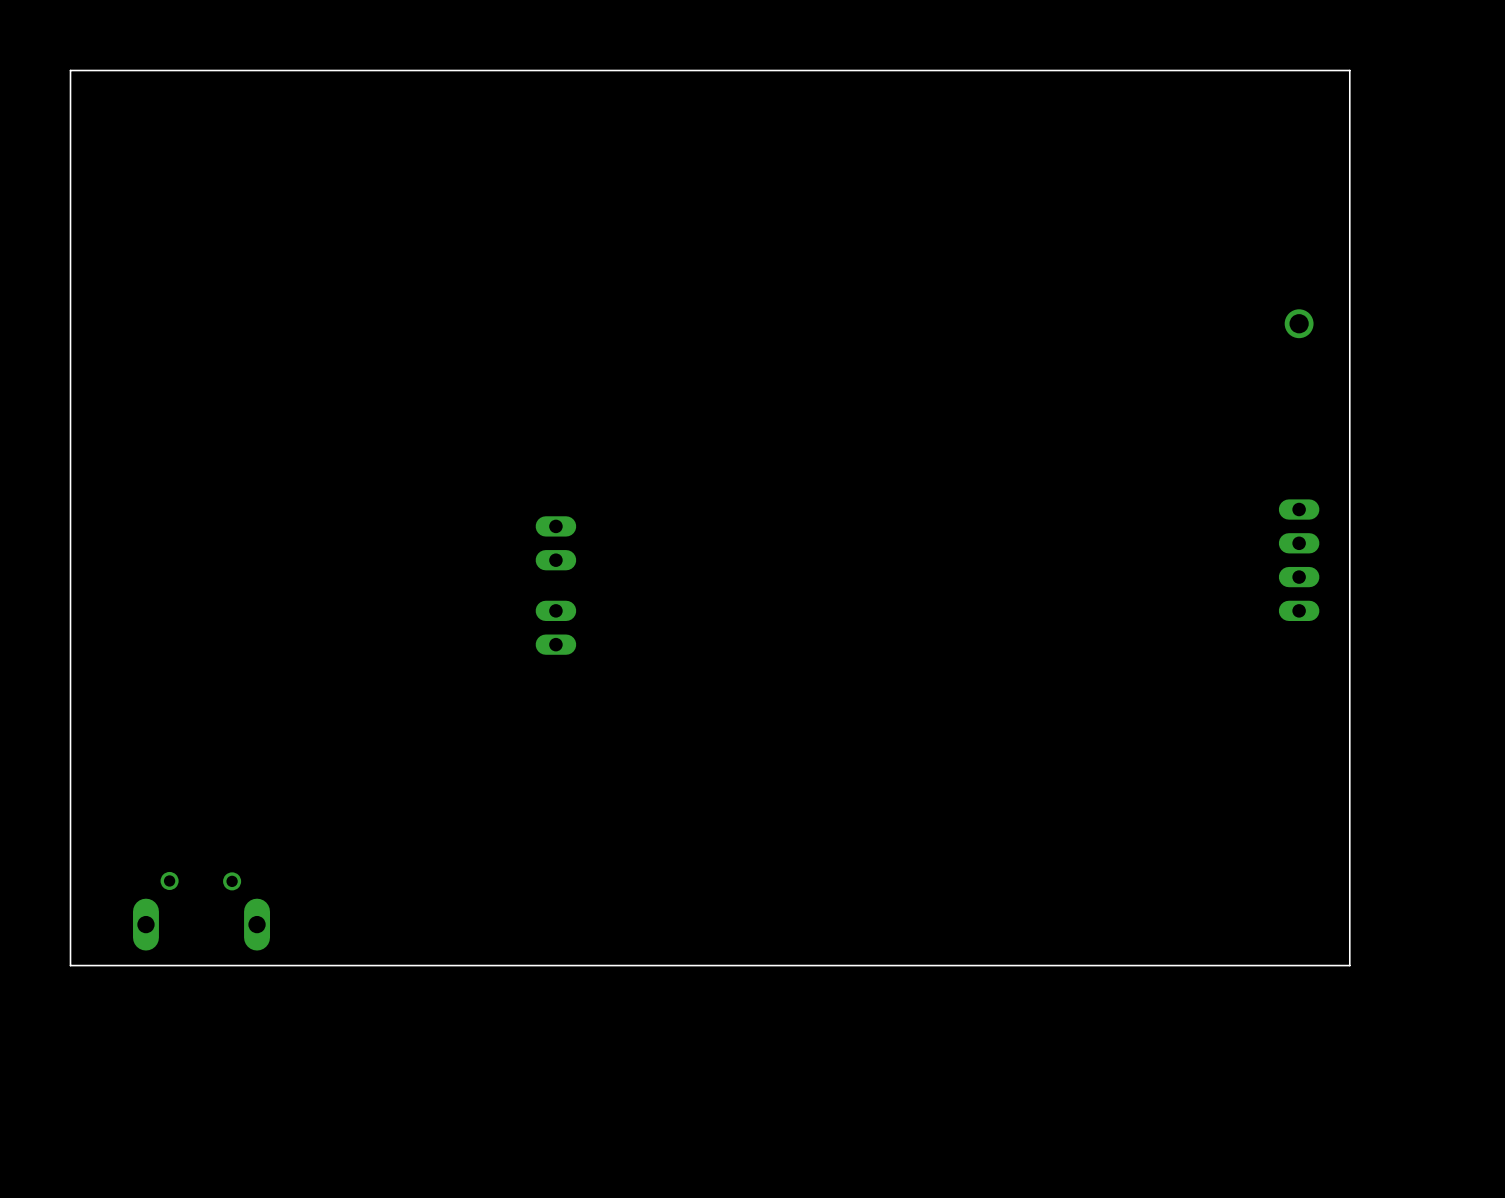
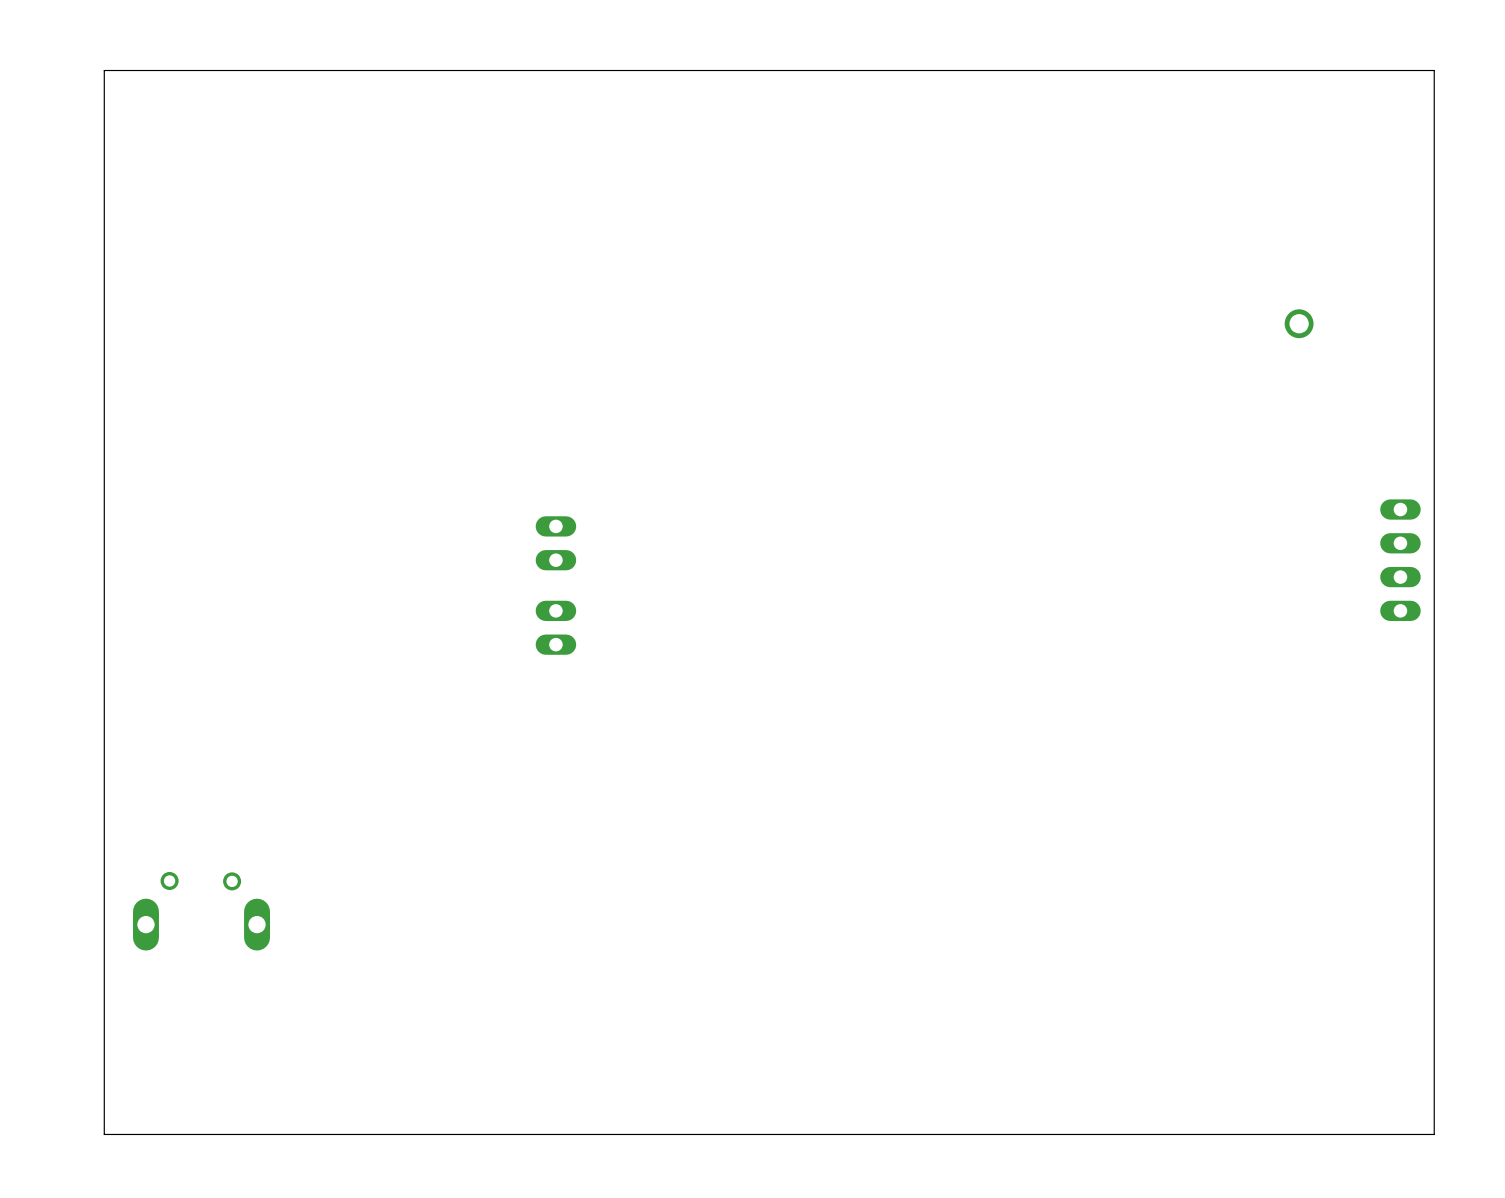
board edge: (1349, 70) (1349, 965) (70, 965) (70, 70) (104, 70) -> (1349, 70) (1434, 70) (1434, 1134) (104, 1134) (104, 70)
part position: (1299, 560) -> (1400, 560)

